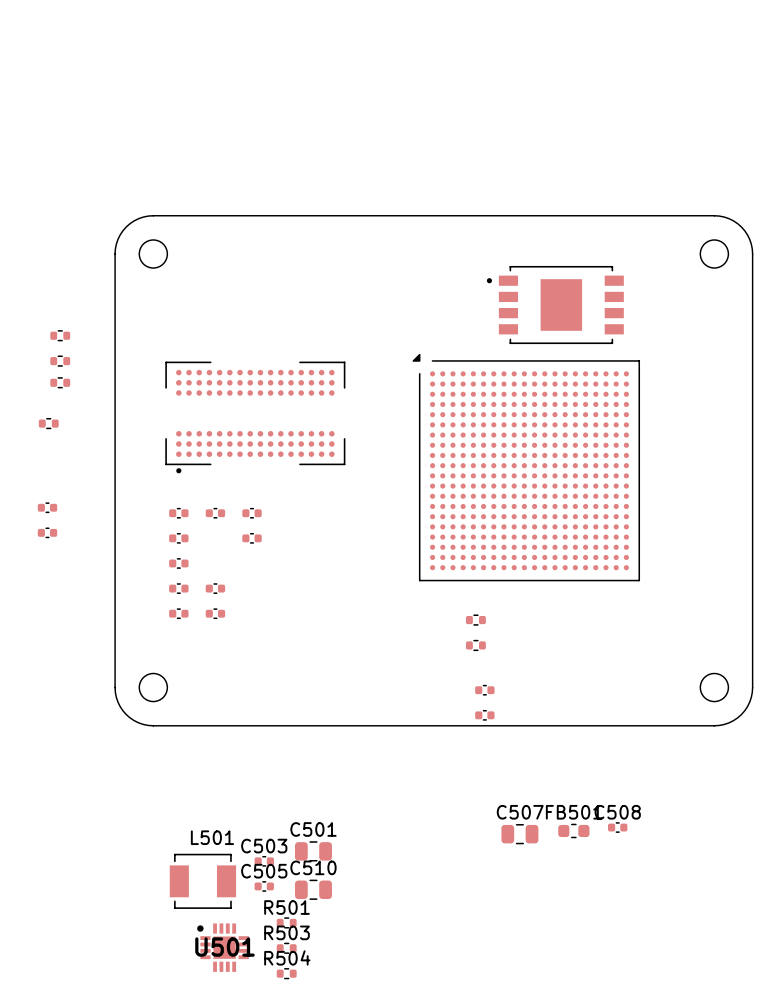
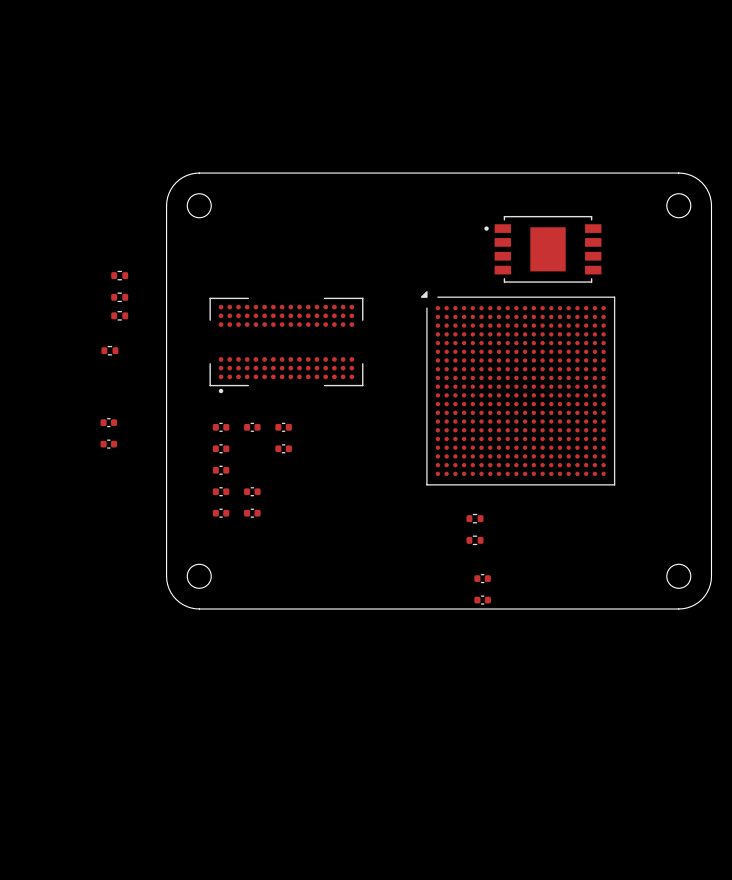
C508: (617, 827) -> none
FB501: (573, 830) -> none
C507: (519, 834) -> none
C501: (313, 851) -> none
C503: (264, 861) -> none
L501: (202, 881) -> none
C505: (264, 886) -> none
C510: (313, 889) -> none
R501: (286, 922) -> none
U501: (223, 947) -> none
R503: (286, 948) -> none
R504: (286, 973) -> none

